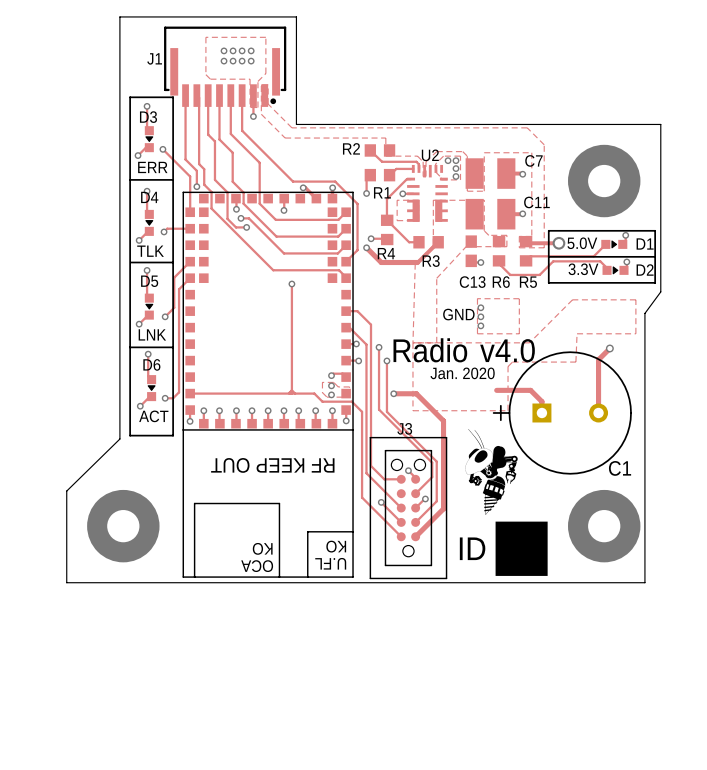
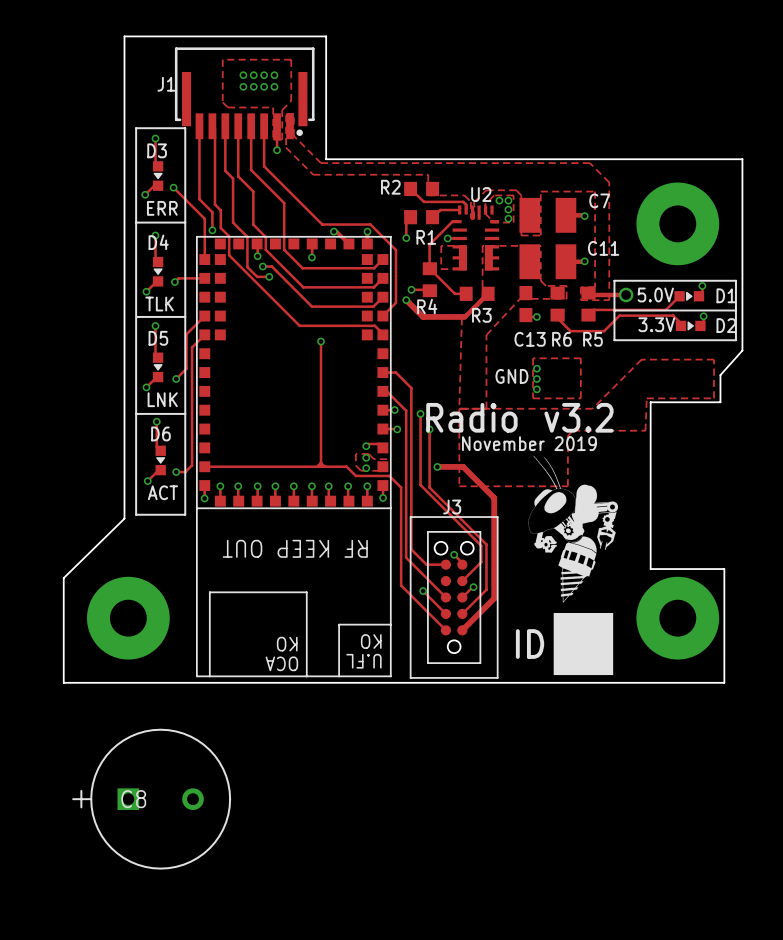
board edge: (660, 291) (644, 313) (644, 483) -> (742, 350) (720, 375) (720, 402) (650, 402) (650, 569) (724, 569)
track: (609, 348) (598, 359) (598, 412) -> none
via: (609, 348) -> none
text: v4.0 (507, 350) -> v3.2 (578, 417)
text: Jan. 2020 (462, 373) -> November 2019 (529, 443)
drawing: none -> [528, 455, 619, 603]
track: (496, 390) (530, 390) (541, 401) (541, 412) -> none
C1: (562, 412) -> none
drawing: [465, 429, 518, 515] -> none
C8: none -> (151, 799)

